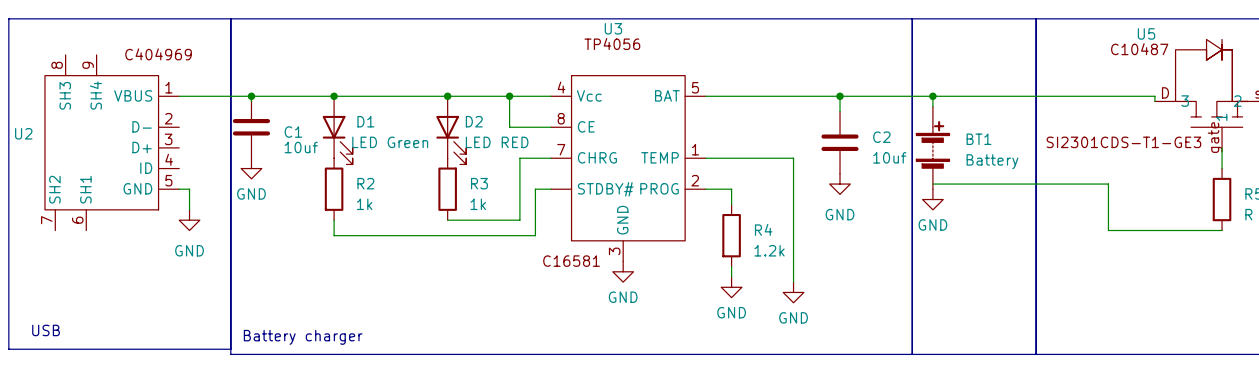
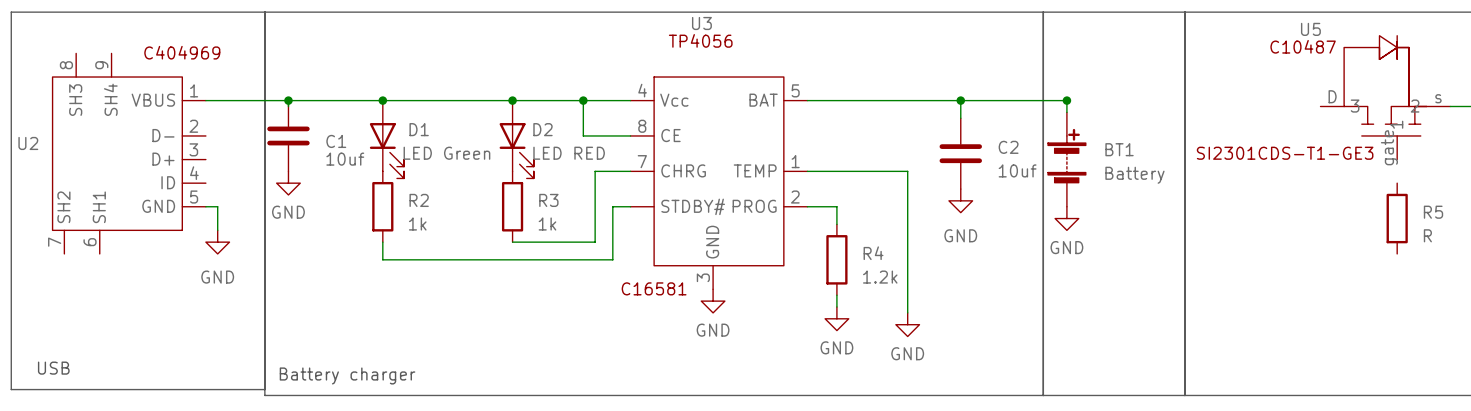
wire: (932, 96) (1154, 96) (1154, 101) -> none
wire: (1222, 147) (1222, 168) -> none
wire: (932, 184) (1108, 184) (1108, 230) (1222, 230) -> none

